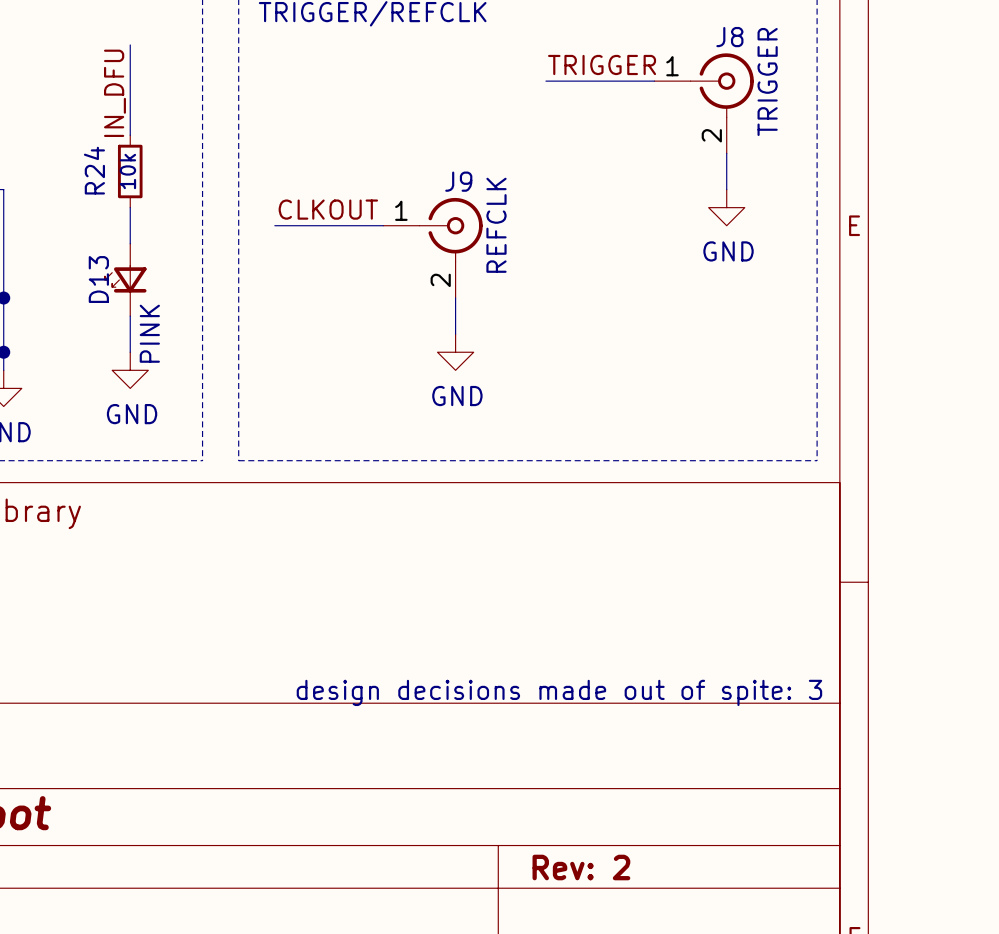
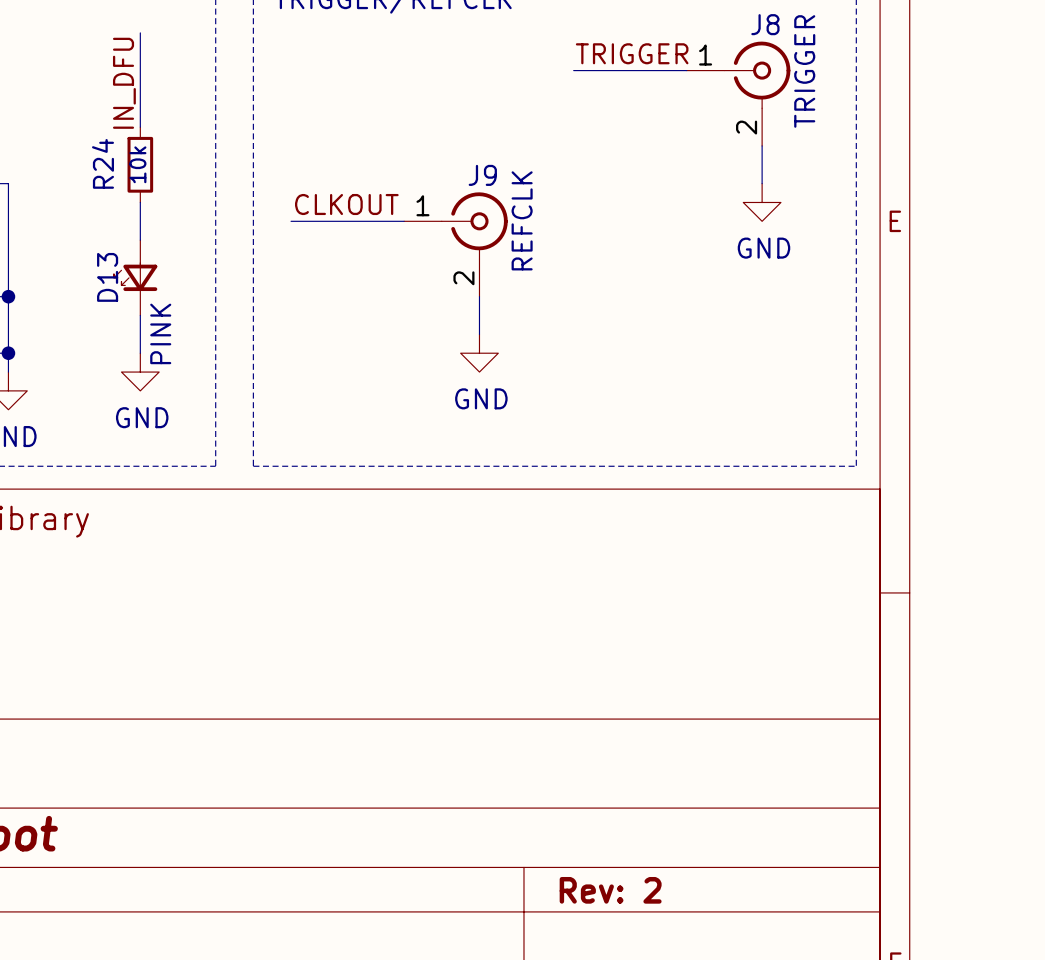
text: design decisions made out of spite: 3 (559, 692) -> none

